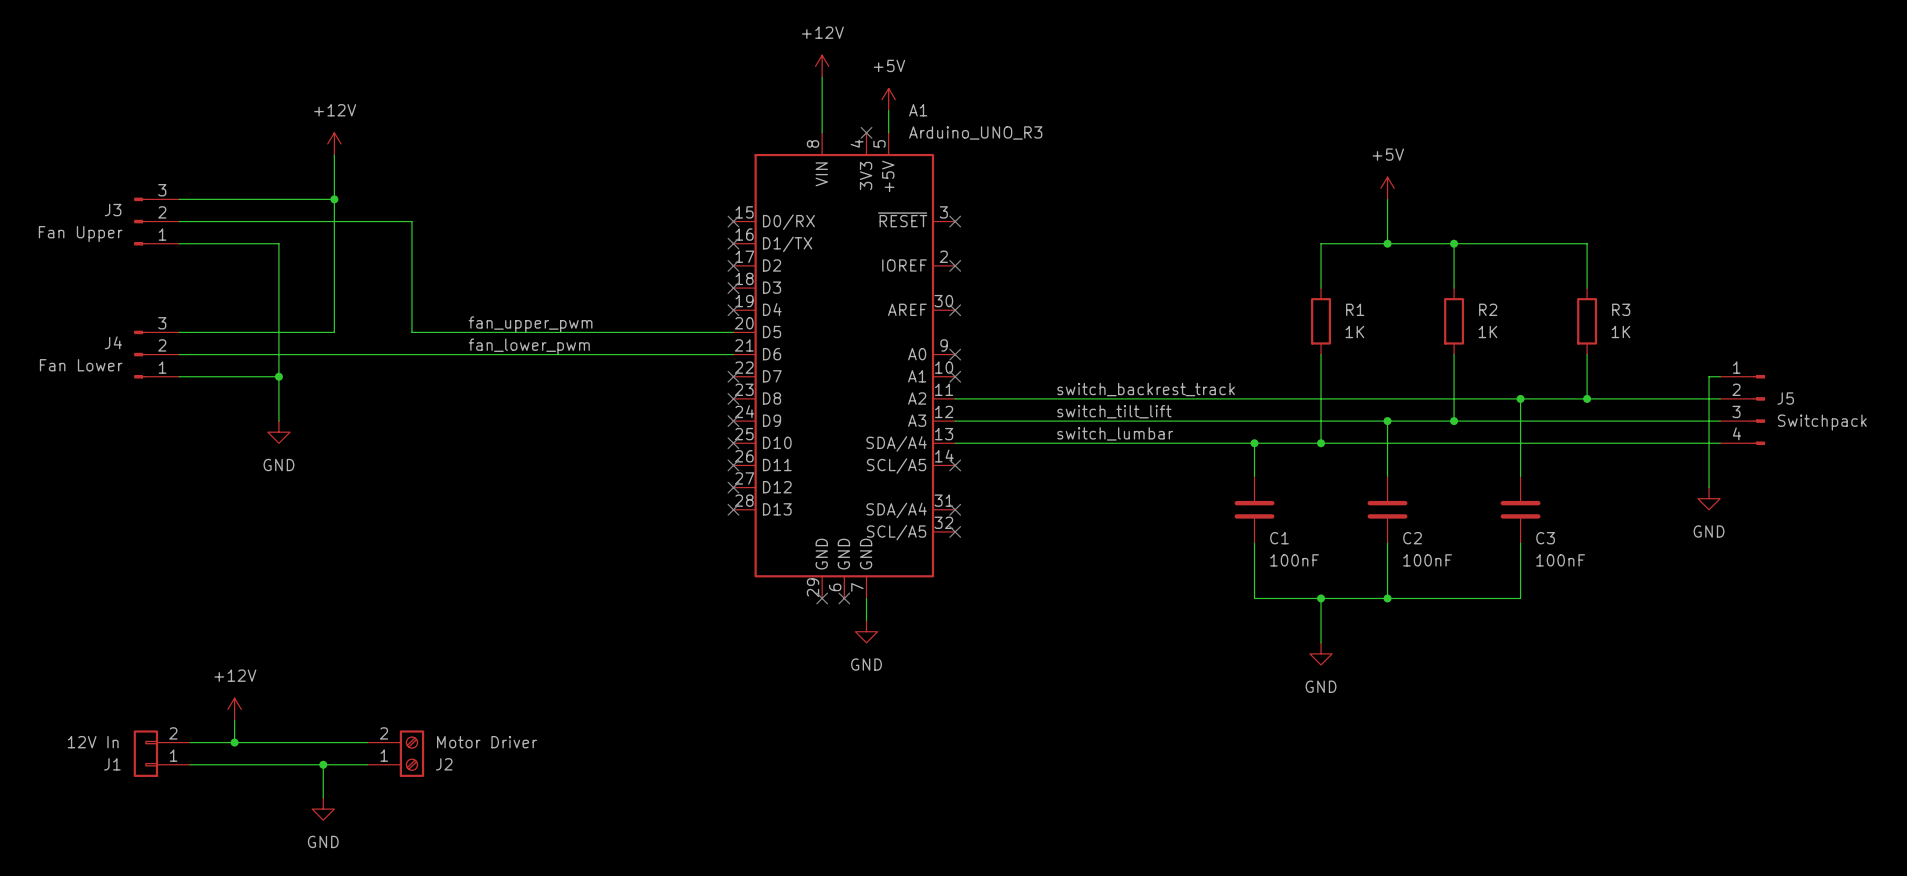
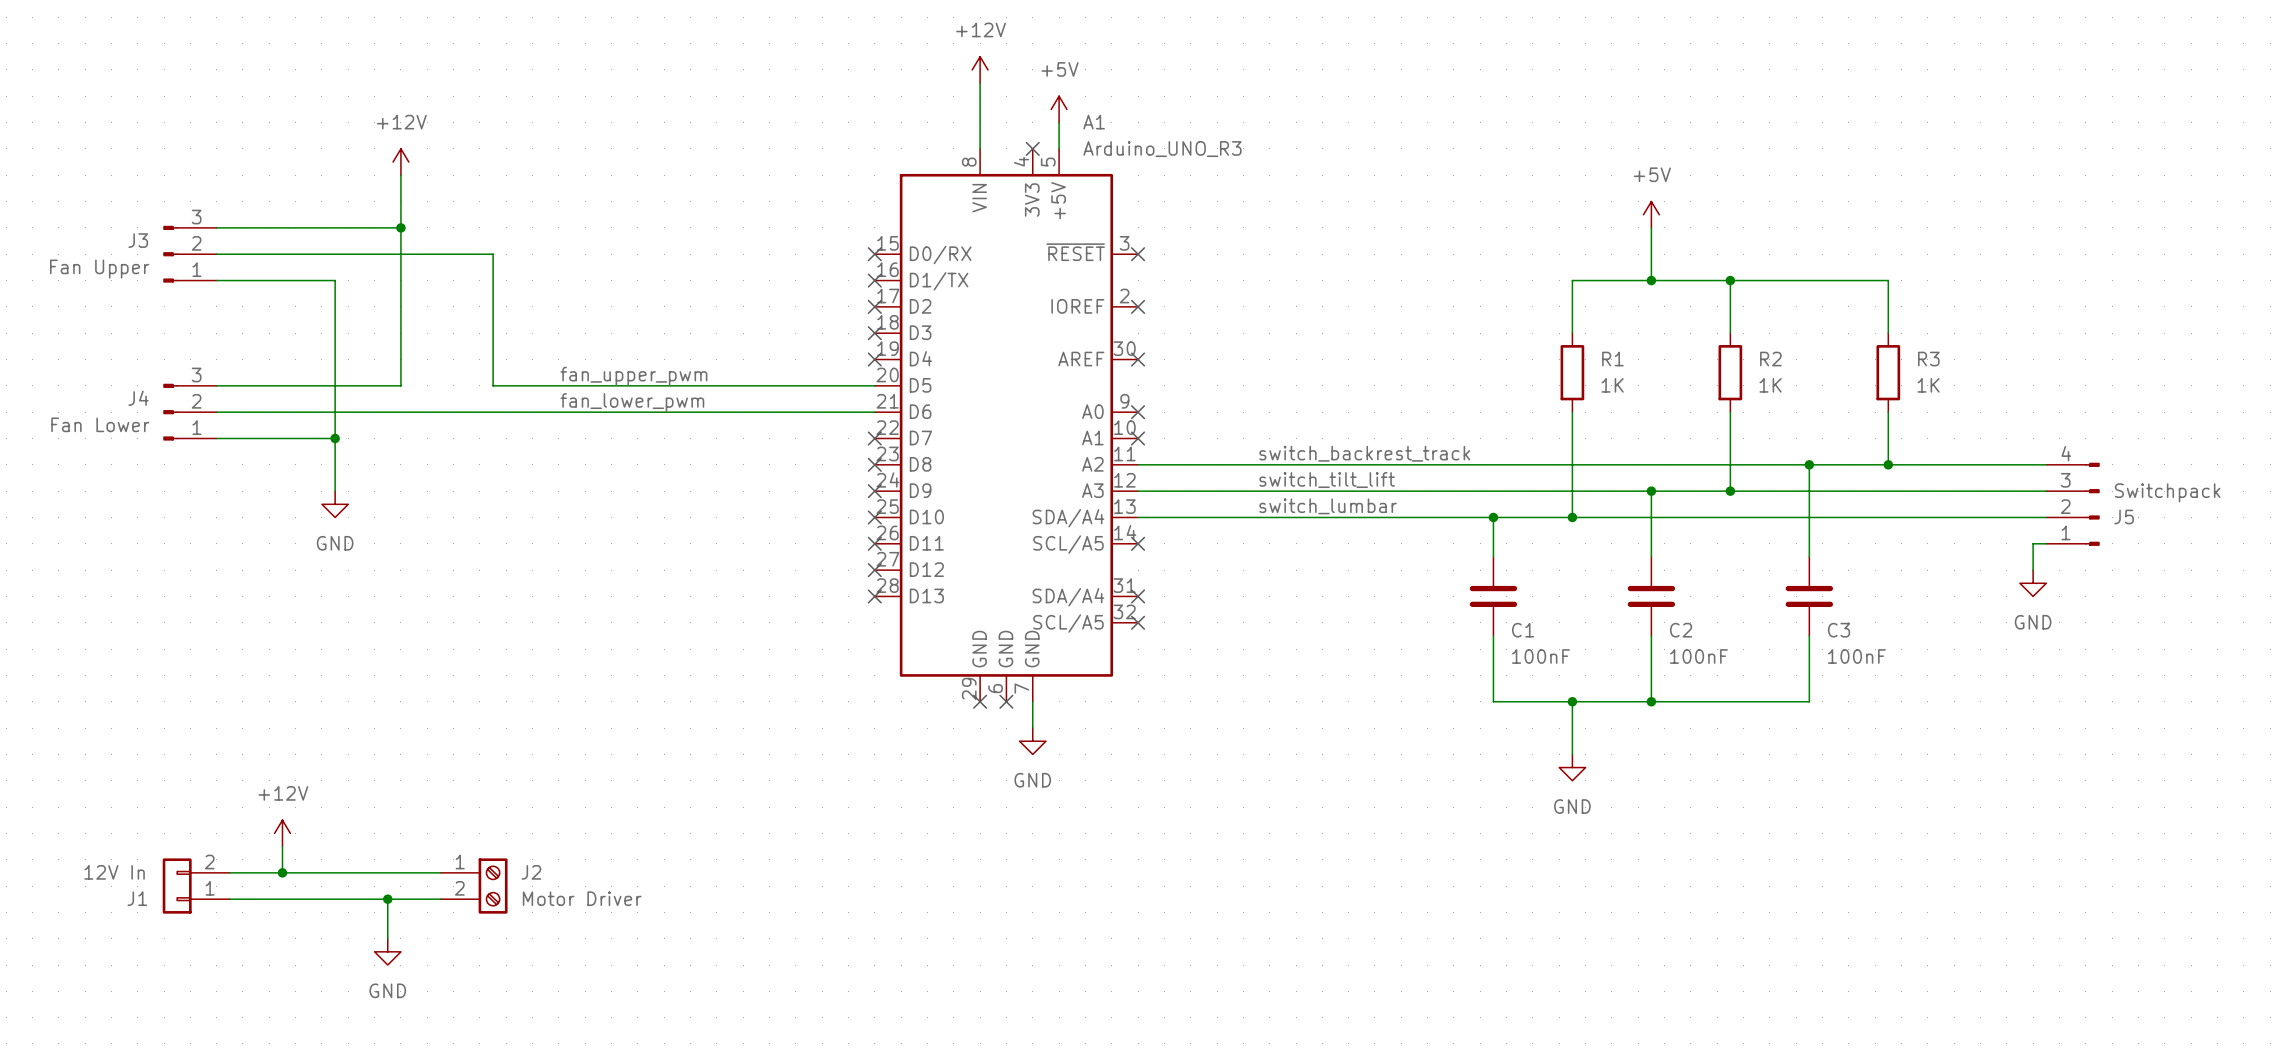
wire: (1720, 376) (1709, 376) (1709, 465) -> (2046, 543) (2033, 543)
J5 flip: as is (1758, 410) -> up-down (2092, 504)
J2 flip: as is (411, 753) -> up-down (493, 886)

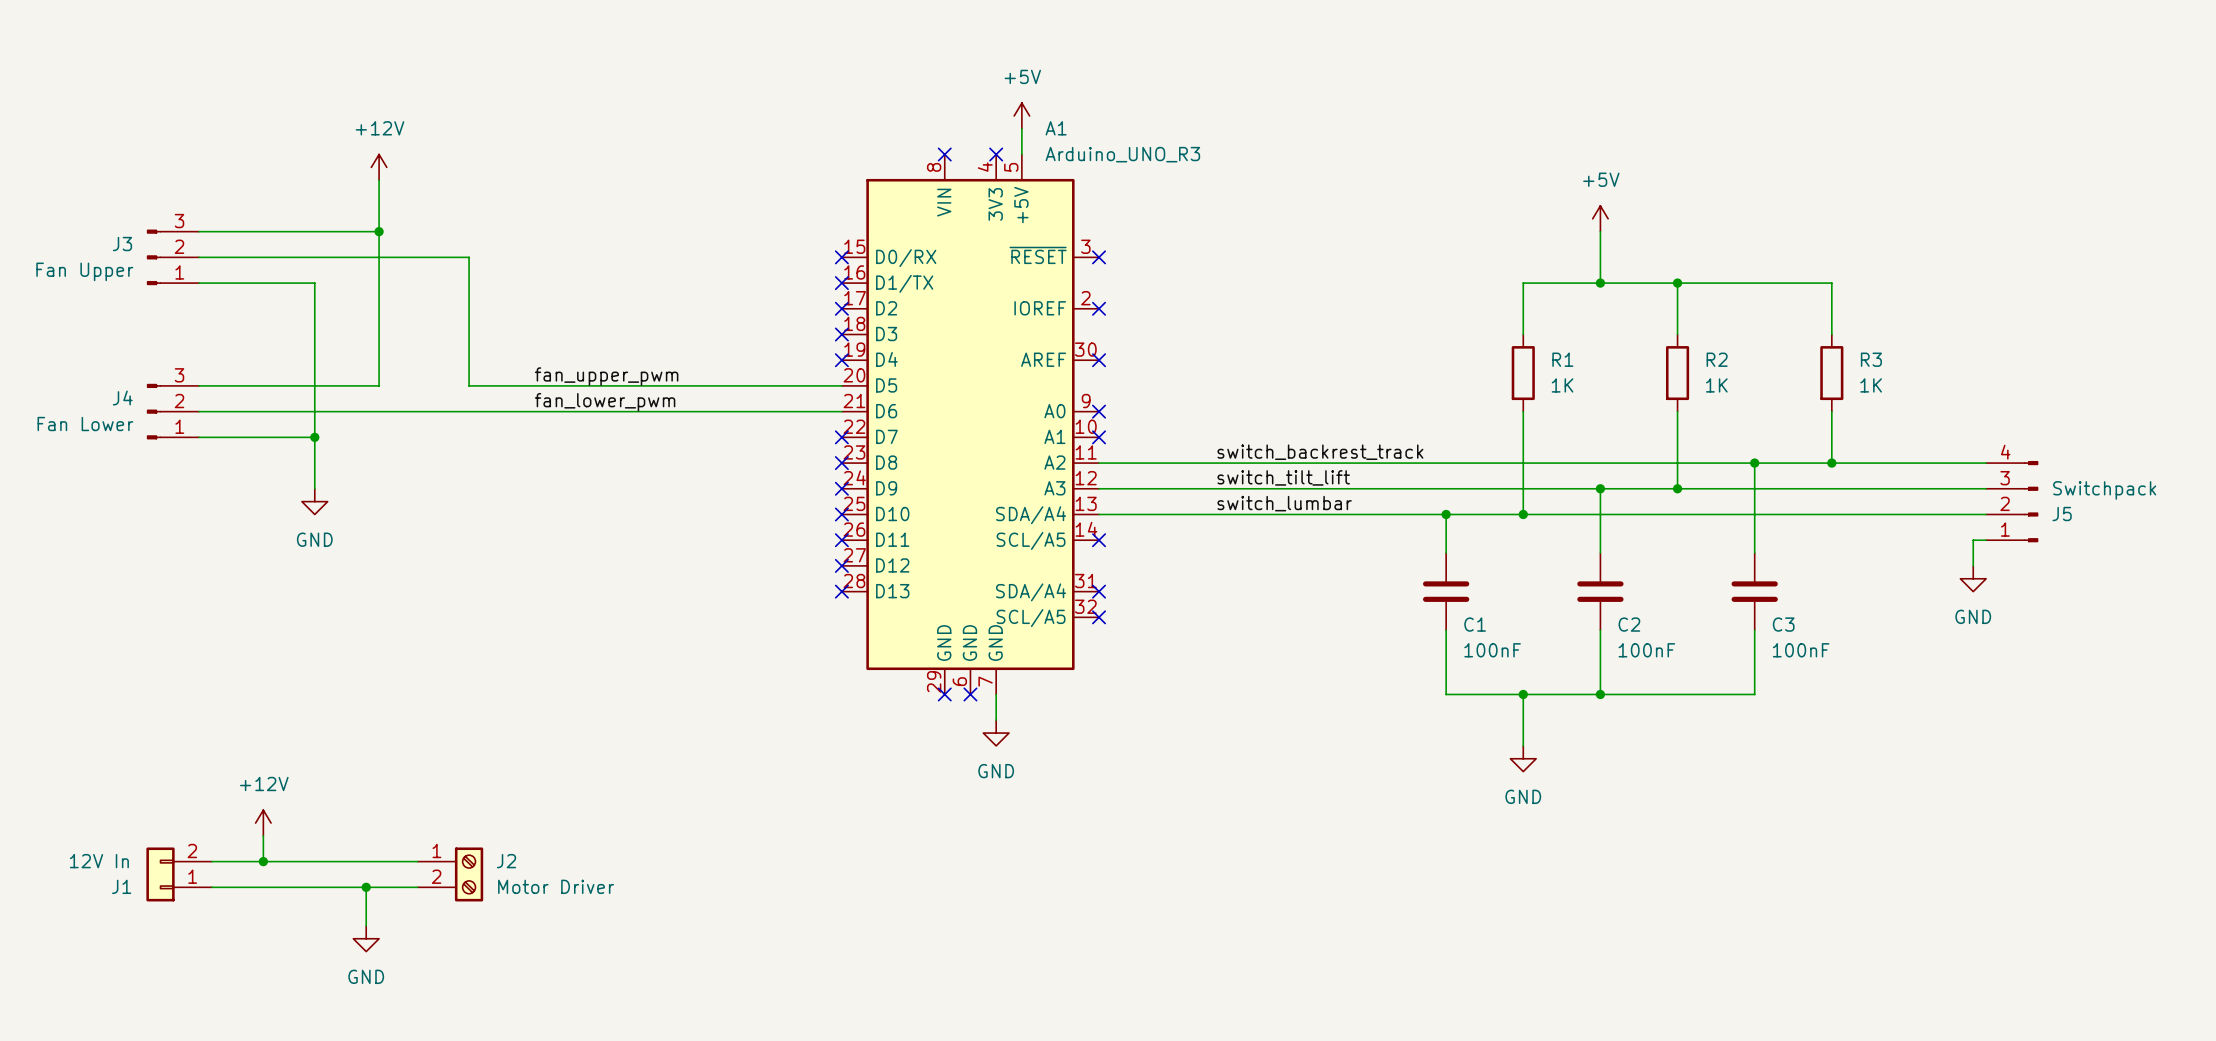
power symbol: +12V (980, 69) -> none
wire: (980, 83) (980, 148) -> none
no-connect mark: none -> (944, 154)

